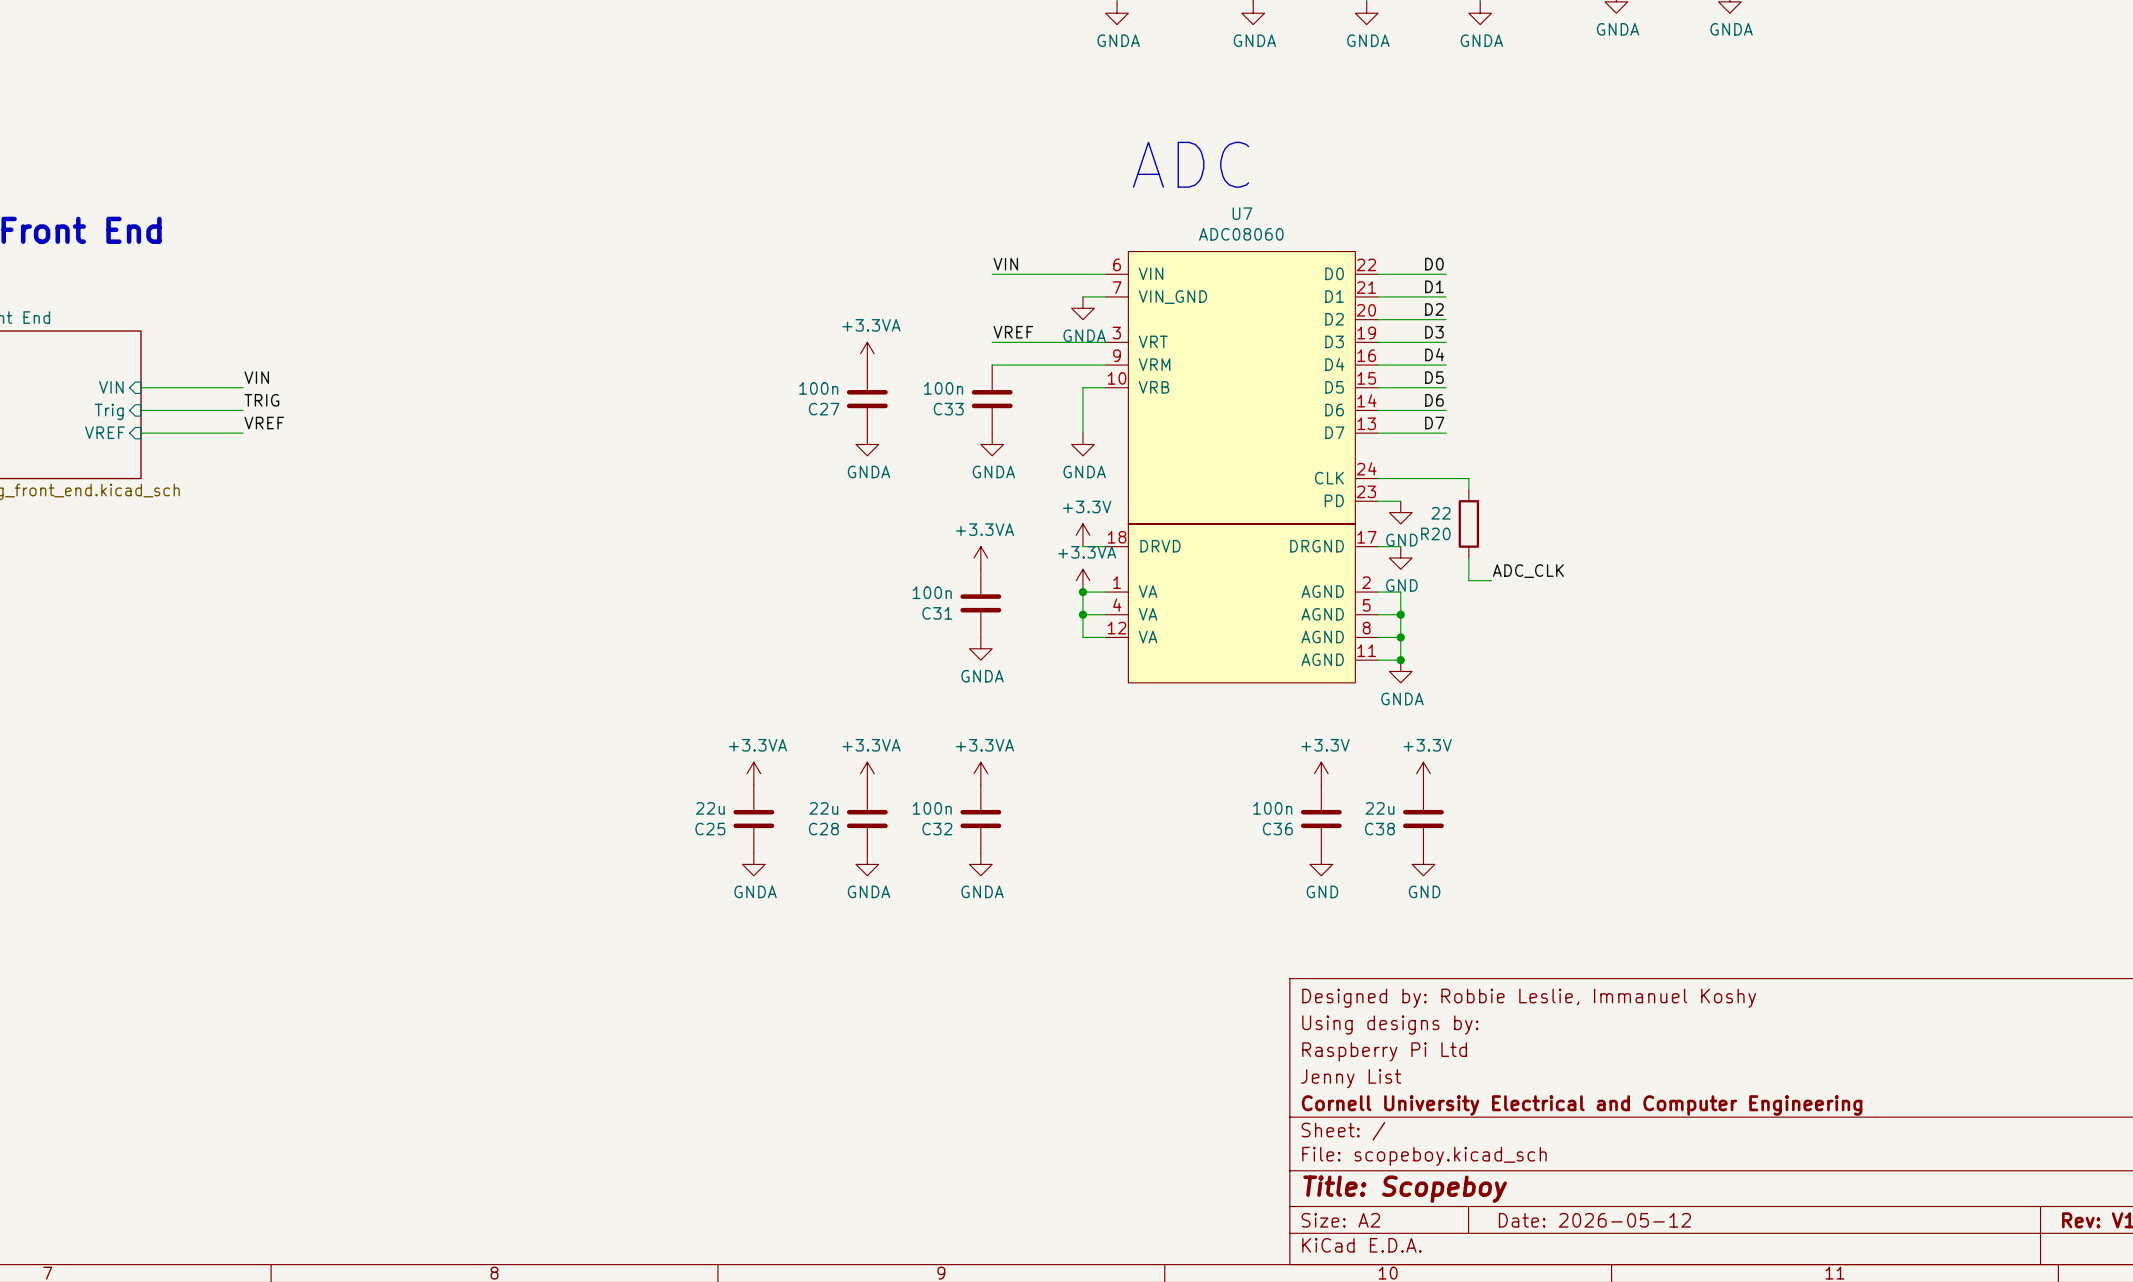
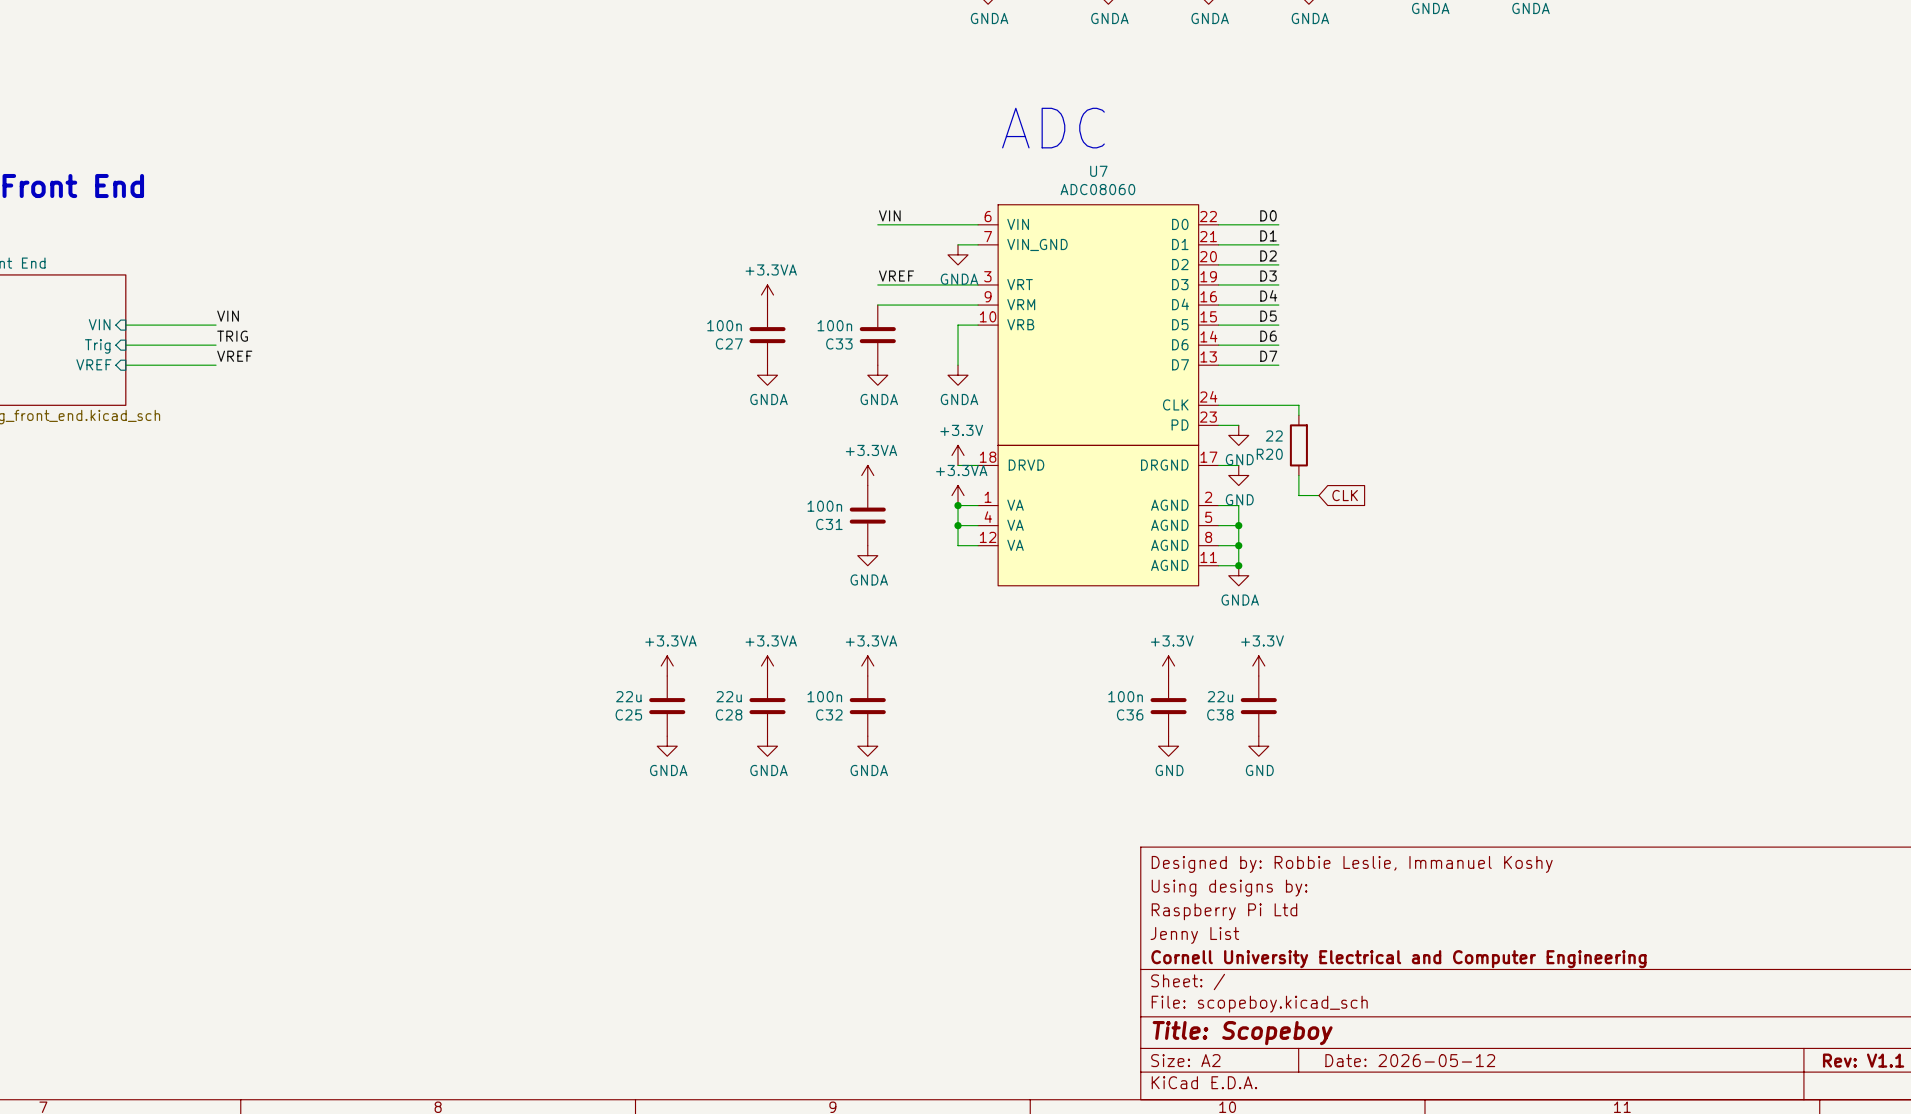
label: ADC_CLK (1528, 571) -> none
global label: none -> CLK (1345, 495)

